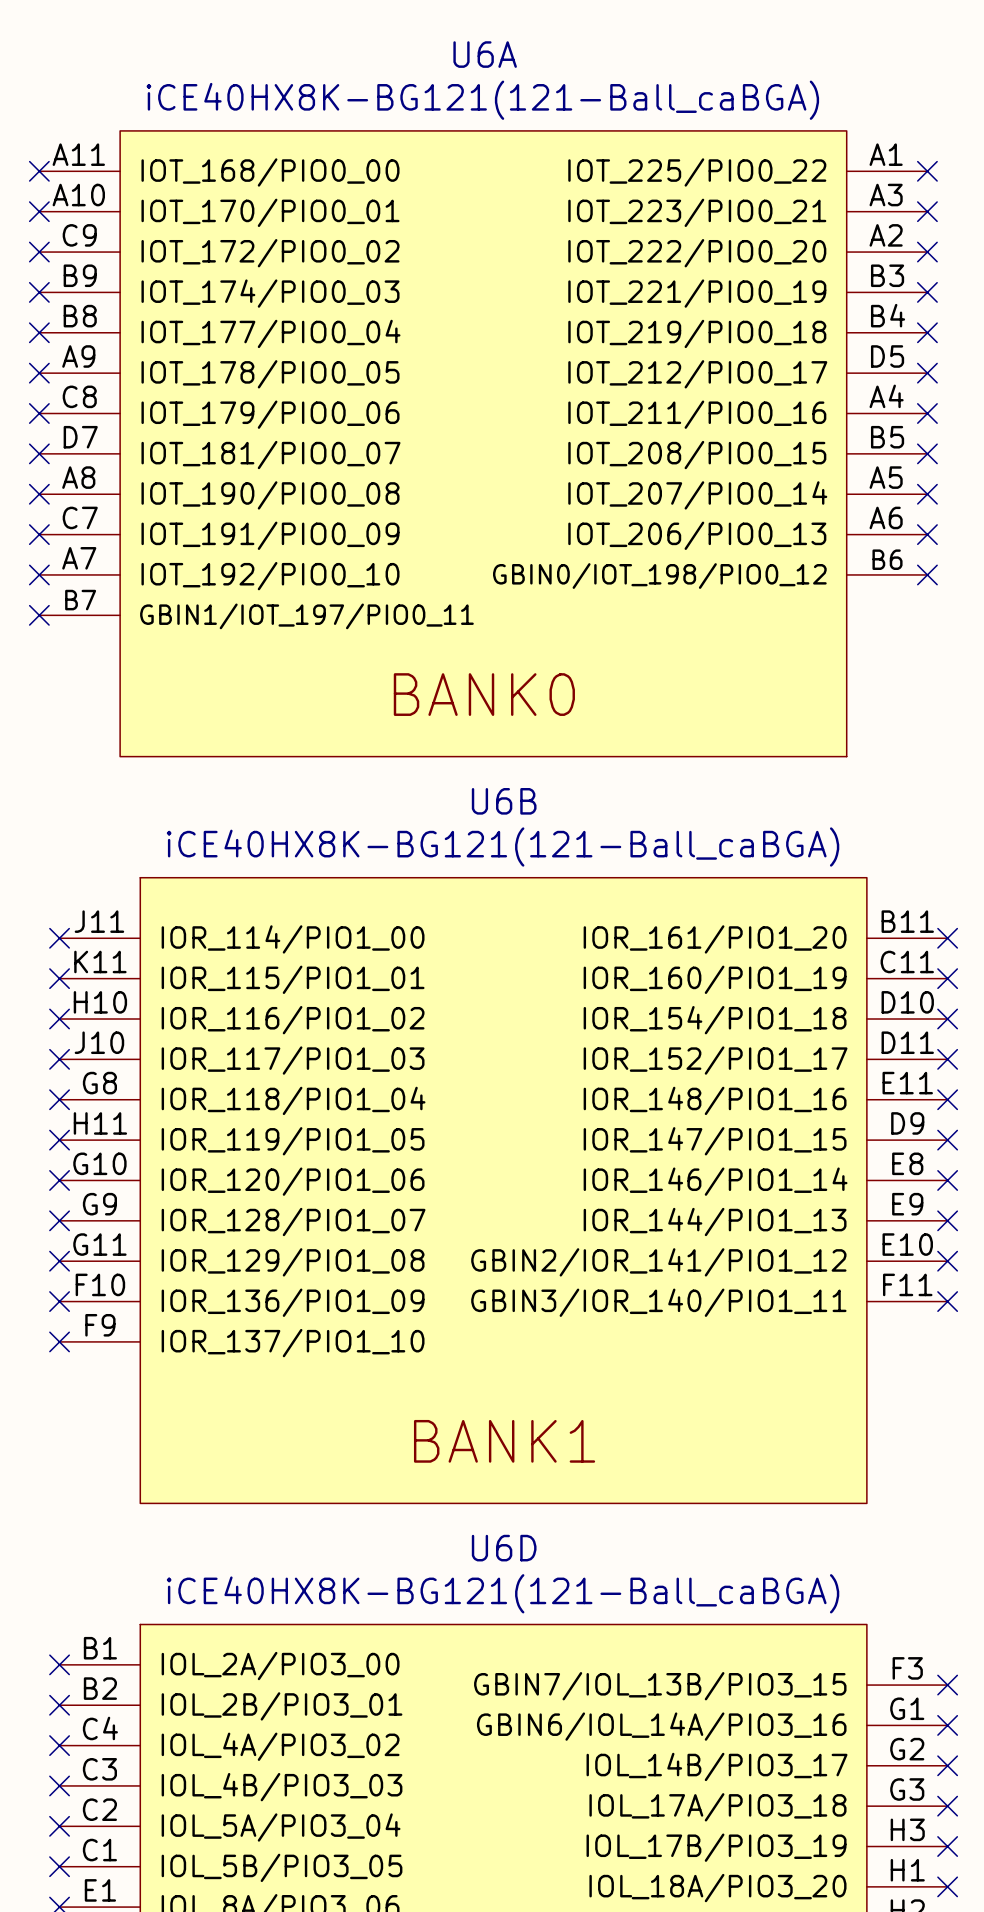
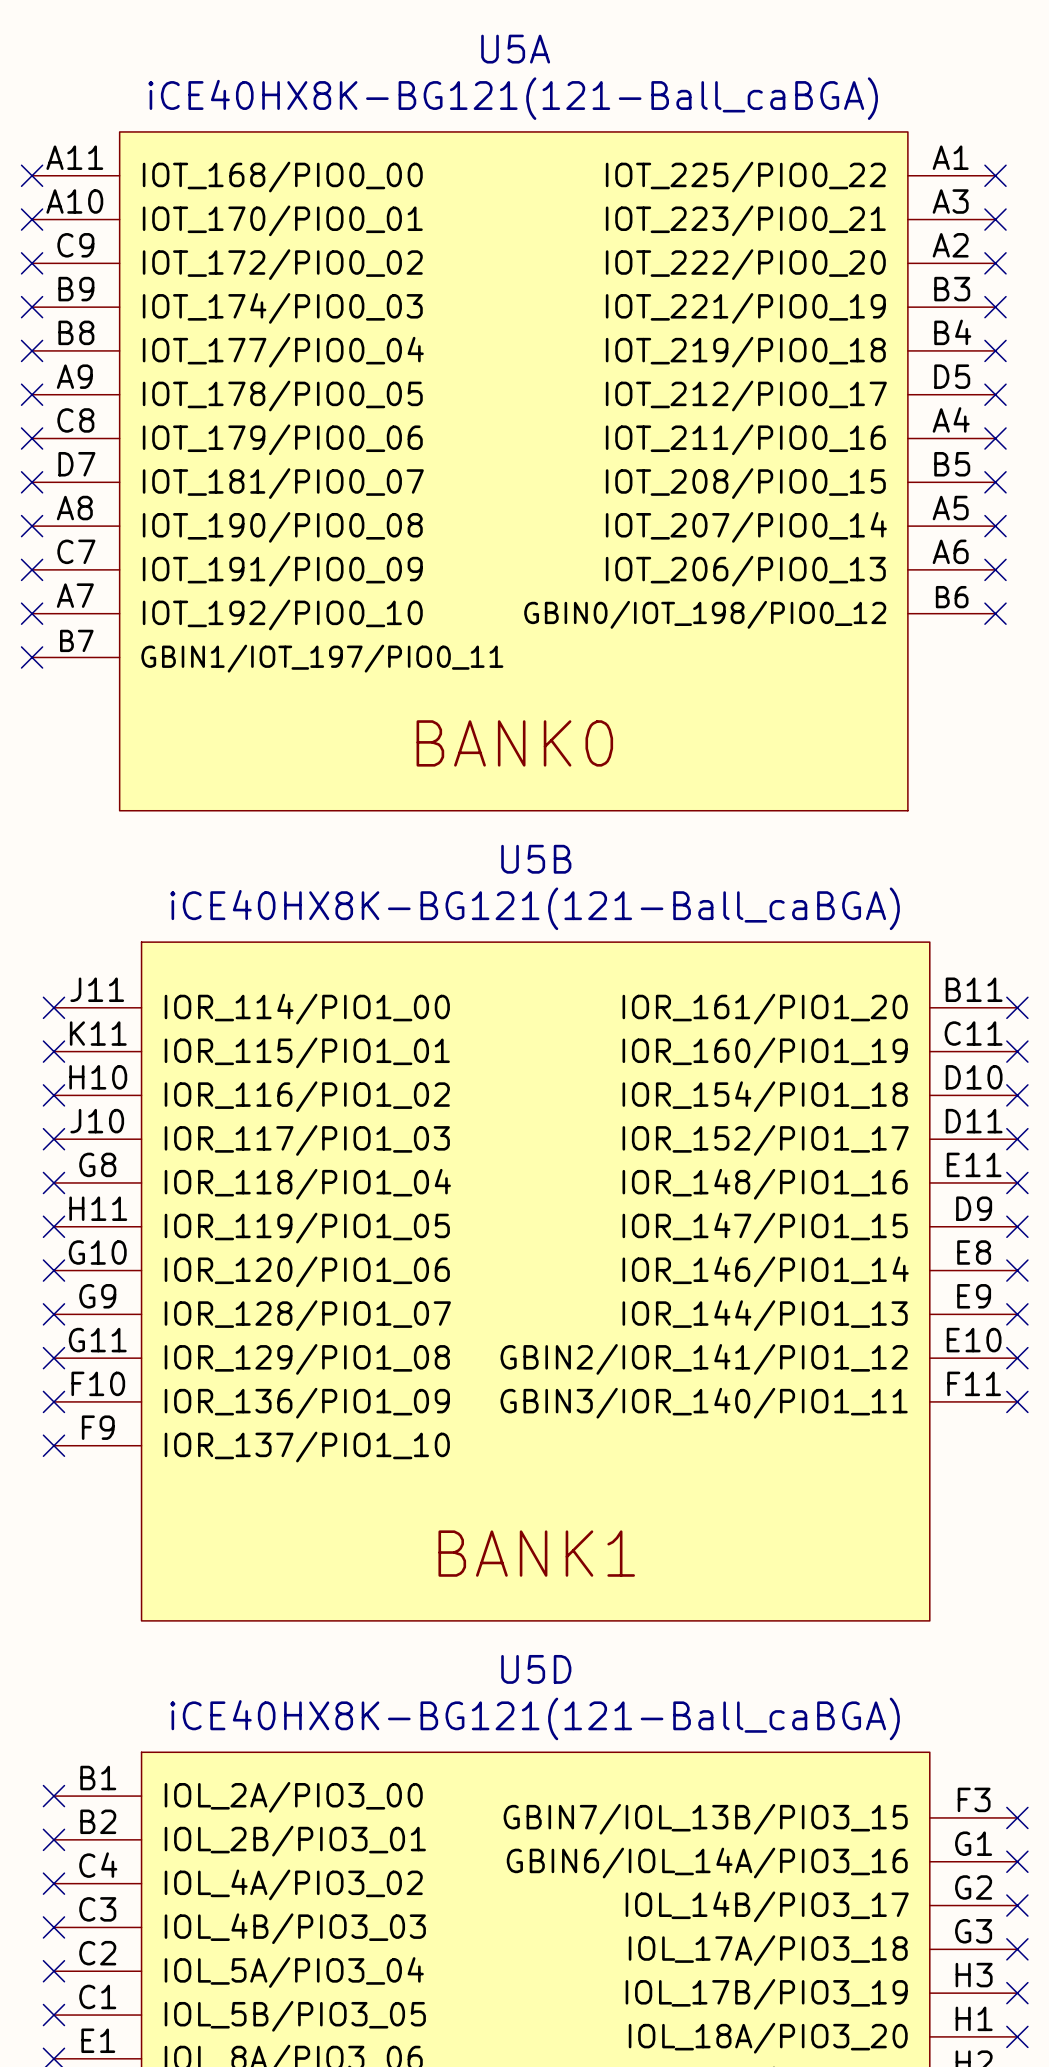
U6A name: U6A (485, 54) -> U5A (515, 49)
U6B name: U6B (504, 801) -> U5B (536, 859)
U6D name: U6D (504, 1548) -> U5D (536, 1669)

